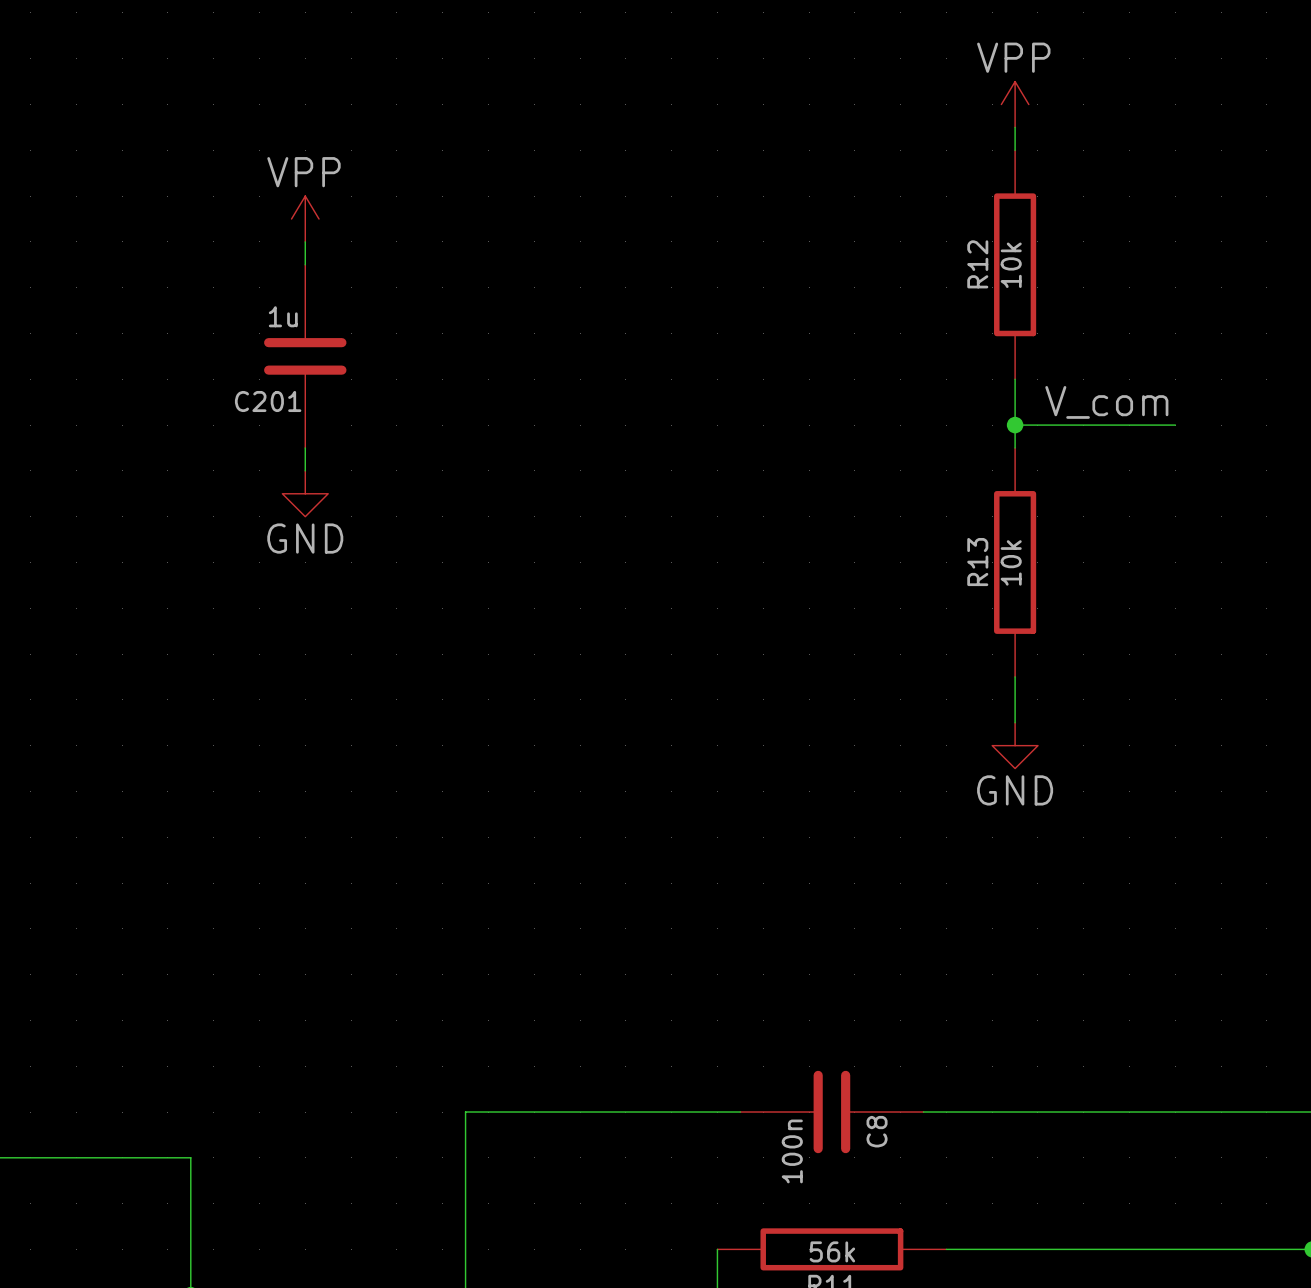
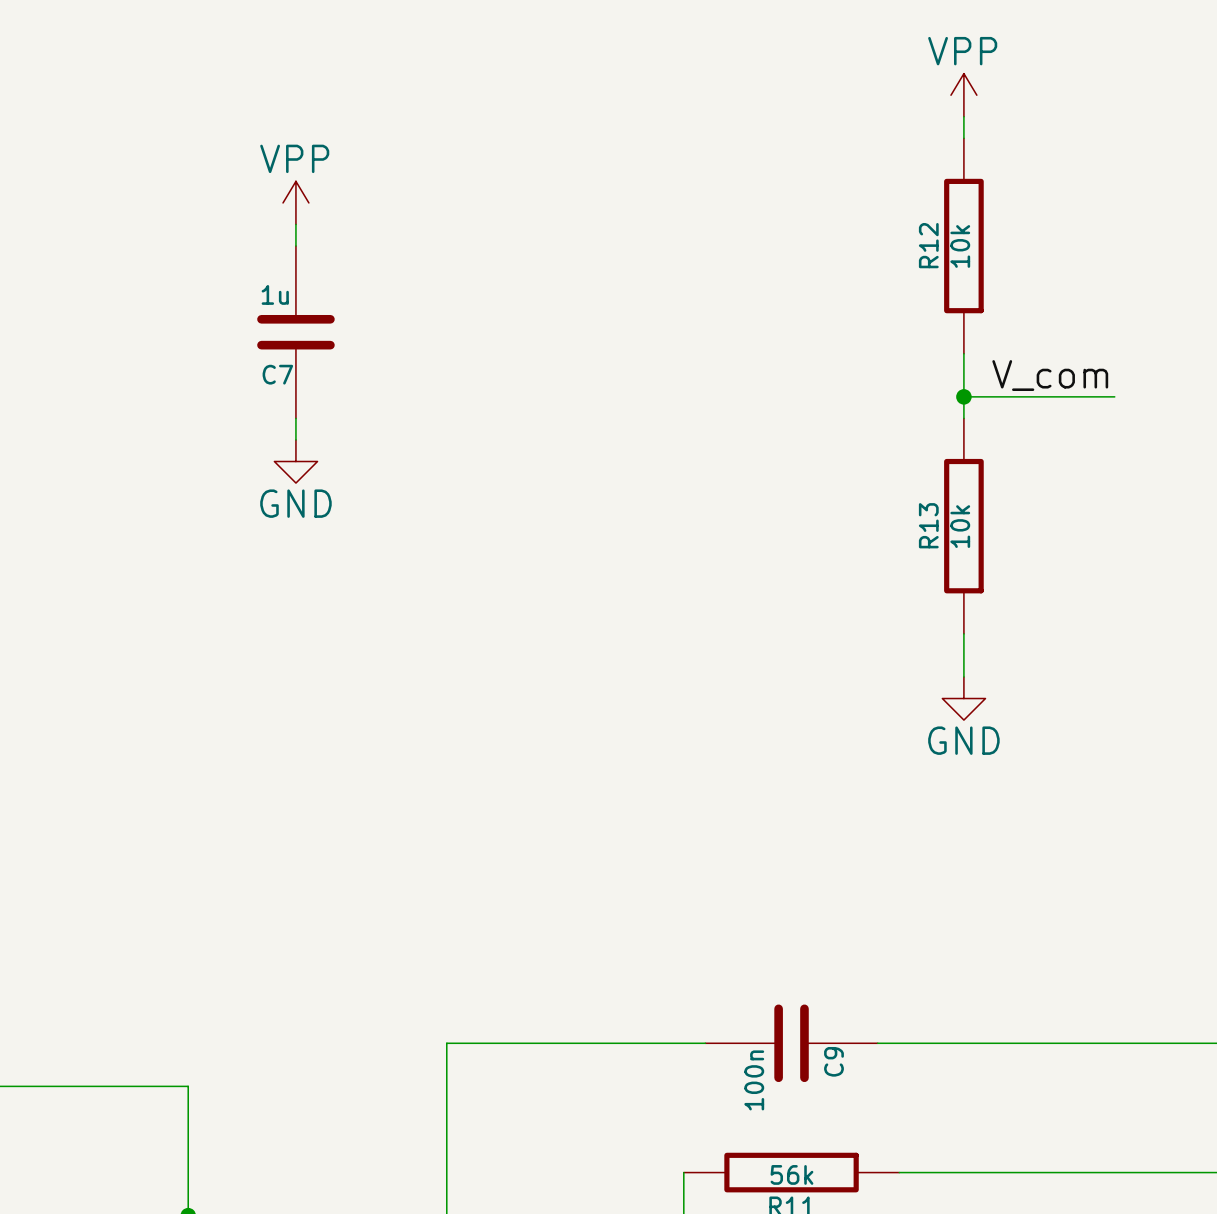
C201 name: C201 (268, 401) -> C7 (277, 374)
C8 name: C8 (877, 1131) -> C9 (833, 1061)

